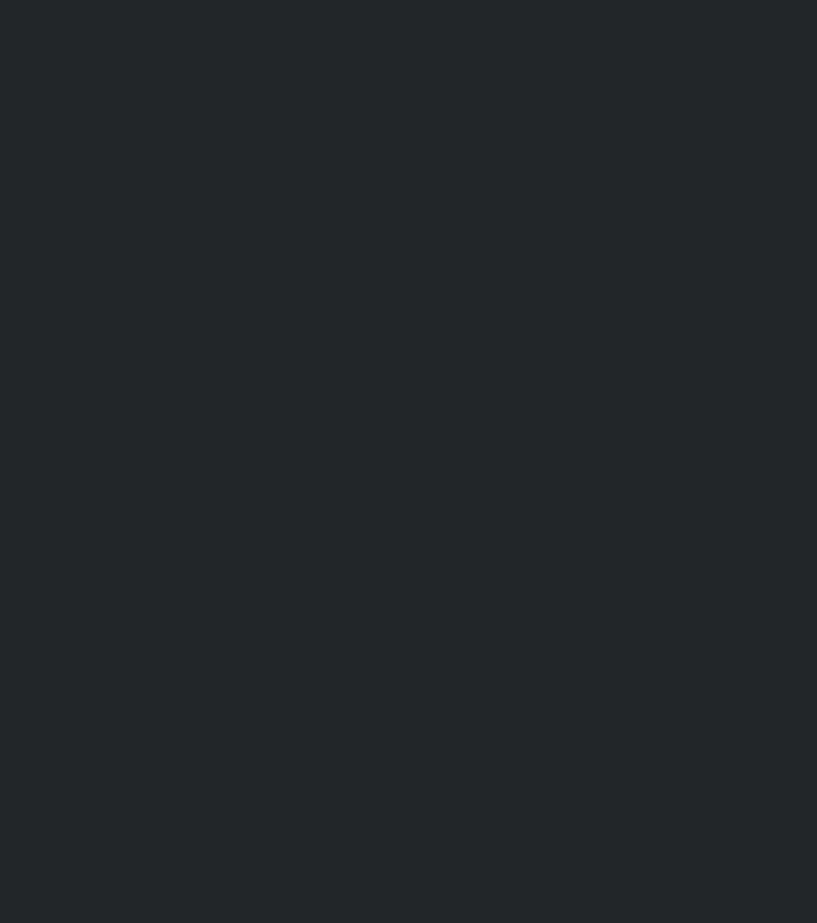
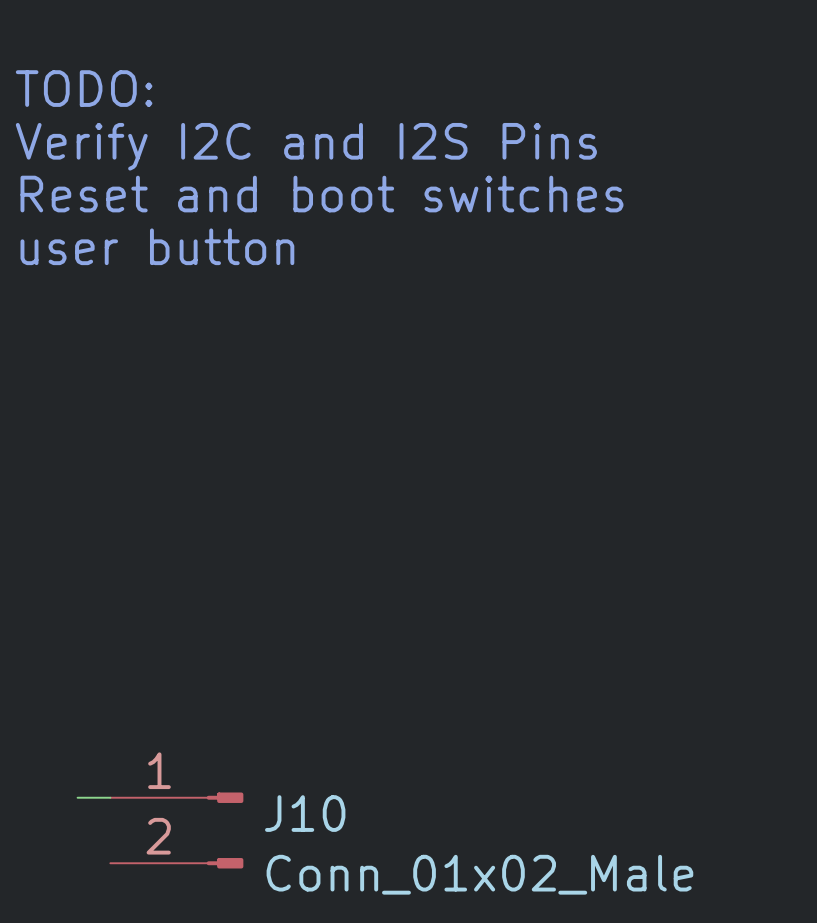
text: none -> TODO: (84, 88)
text: none -> Verify I2C and I2S Pins (306, 146)
text: none -> Reset and boot switches (321, 194)
text: none -> user button (157, 246)
wire: none -> (77, 797) (110, 797)
J10: none -> Conn_01x02_Male (176, 830)

